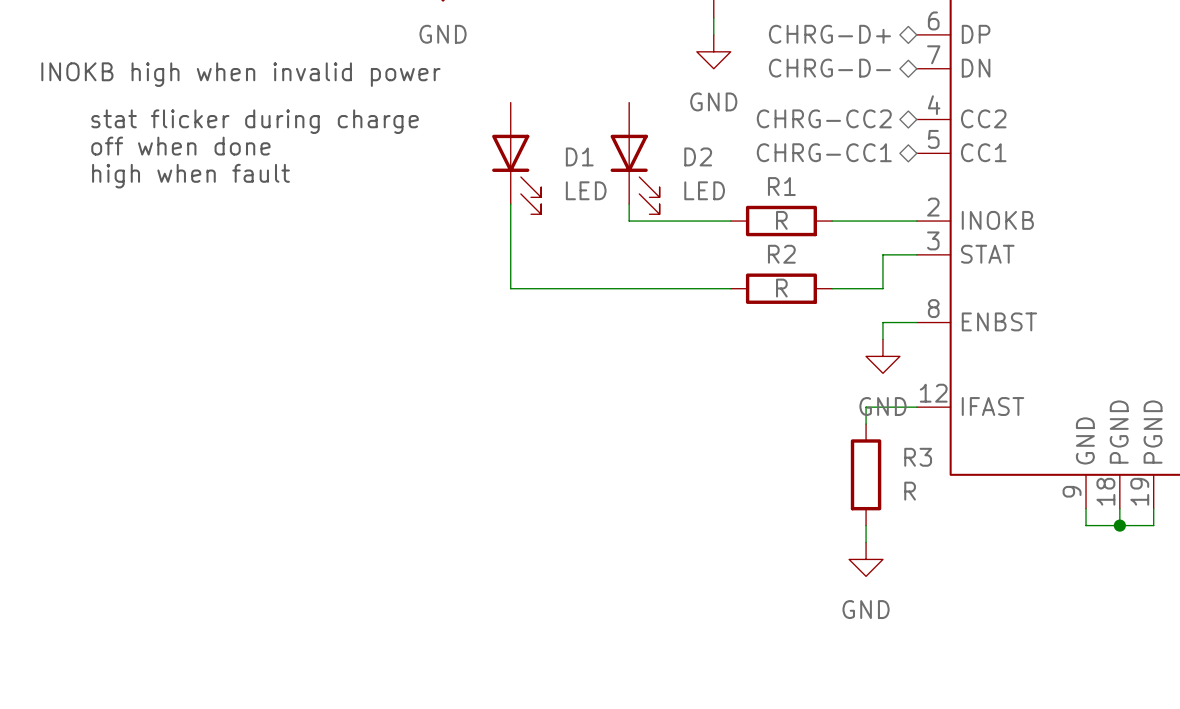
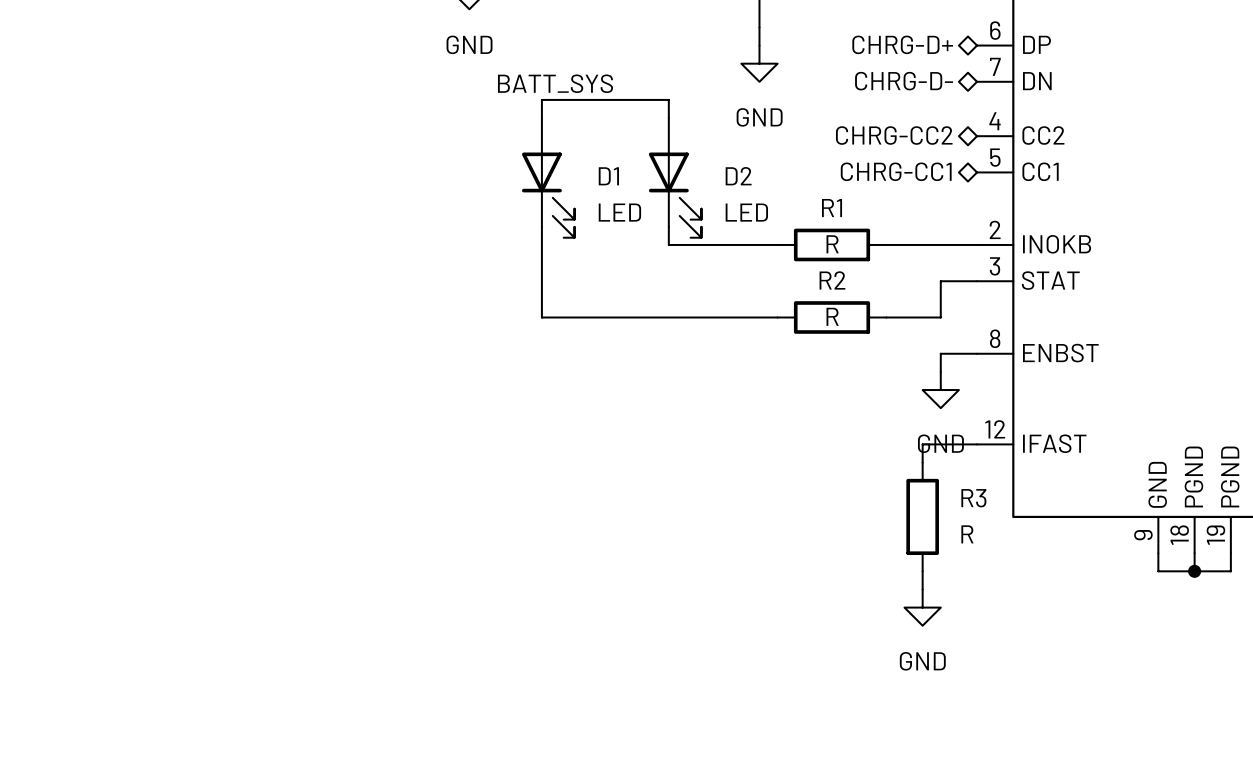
label: none -> BATT_SYS (555, 83)
text: INOKB high when invalid power (240, 74) -> none
wire: none -> (541, 118) (541, 99) (668, 99) (668, 118)
text: stat flicker during charge (255, 121) -> none
text: off when done (180, 146) -> none
text: high when fault (190, 176) -> none

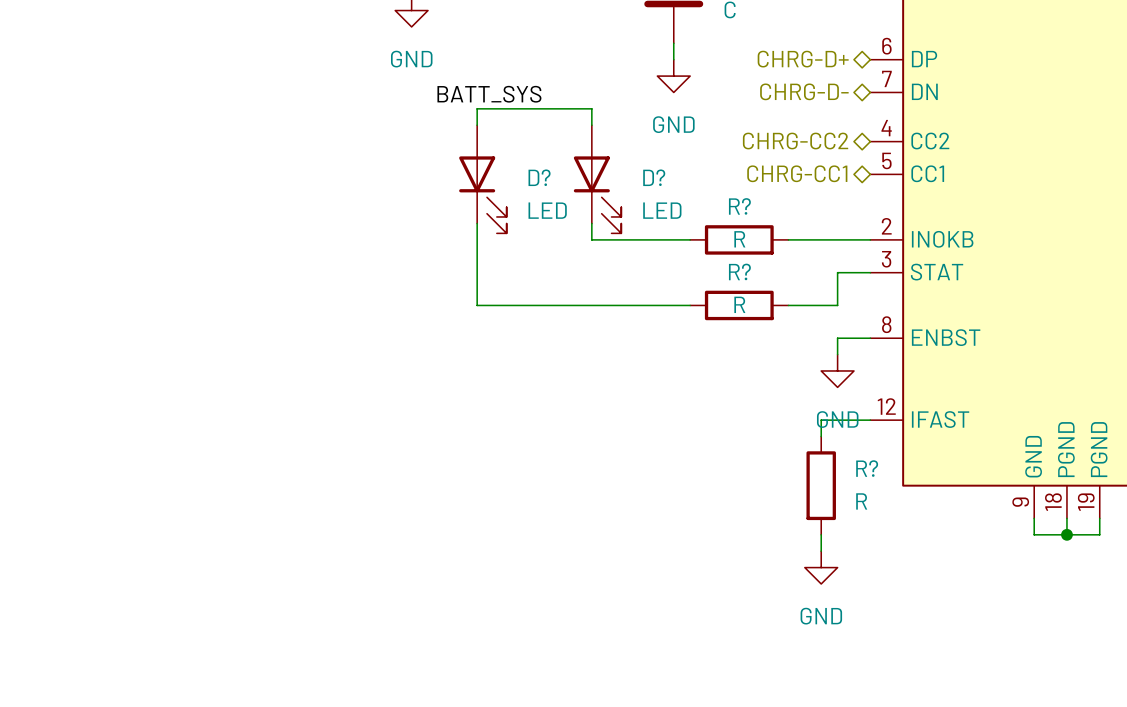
D1 name: D1 (608, 176) -> D? (539, 177)
D2 name: D2 (738, 176) -> D? (654, 177)
R1 name: R1 (832, 208) -> R? (739, 206)
R2 name: R2 (832, 280) -> R? (739, 271)
R3 name: R3 (973, 498) -> R? (867, 468)

